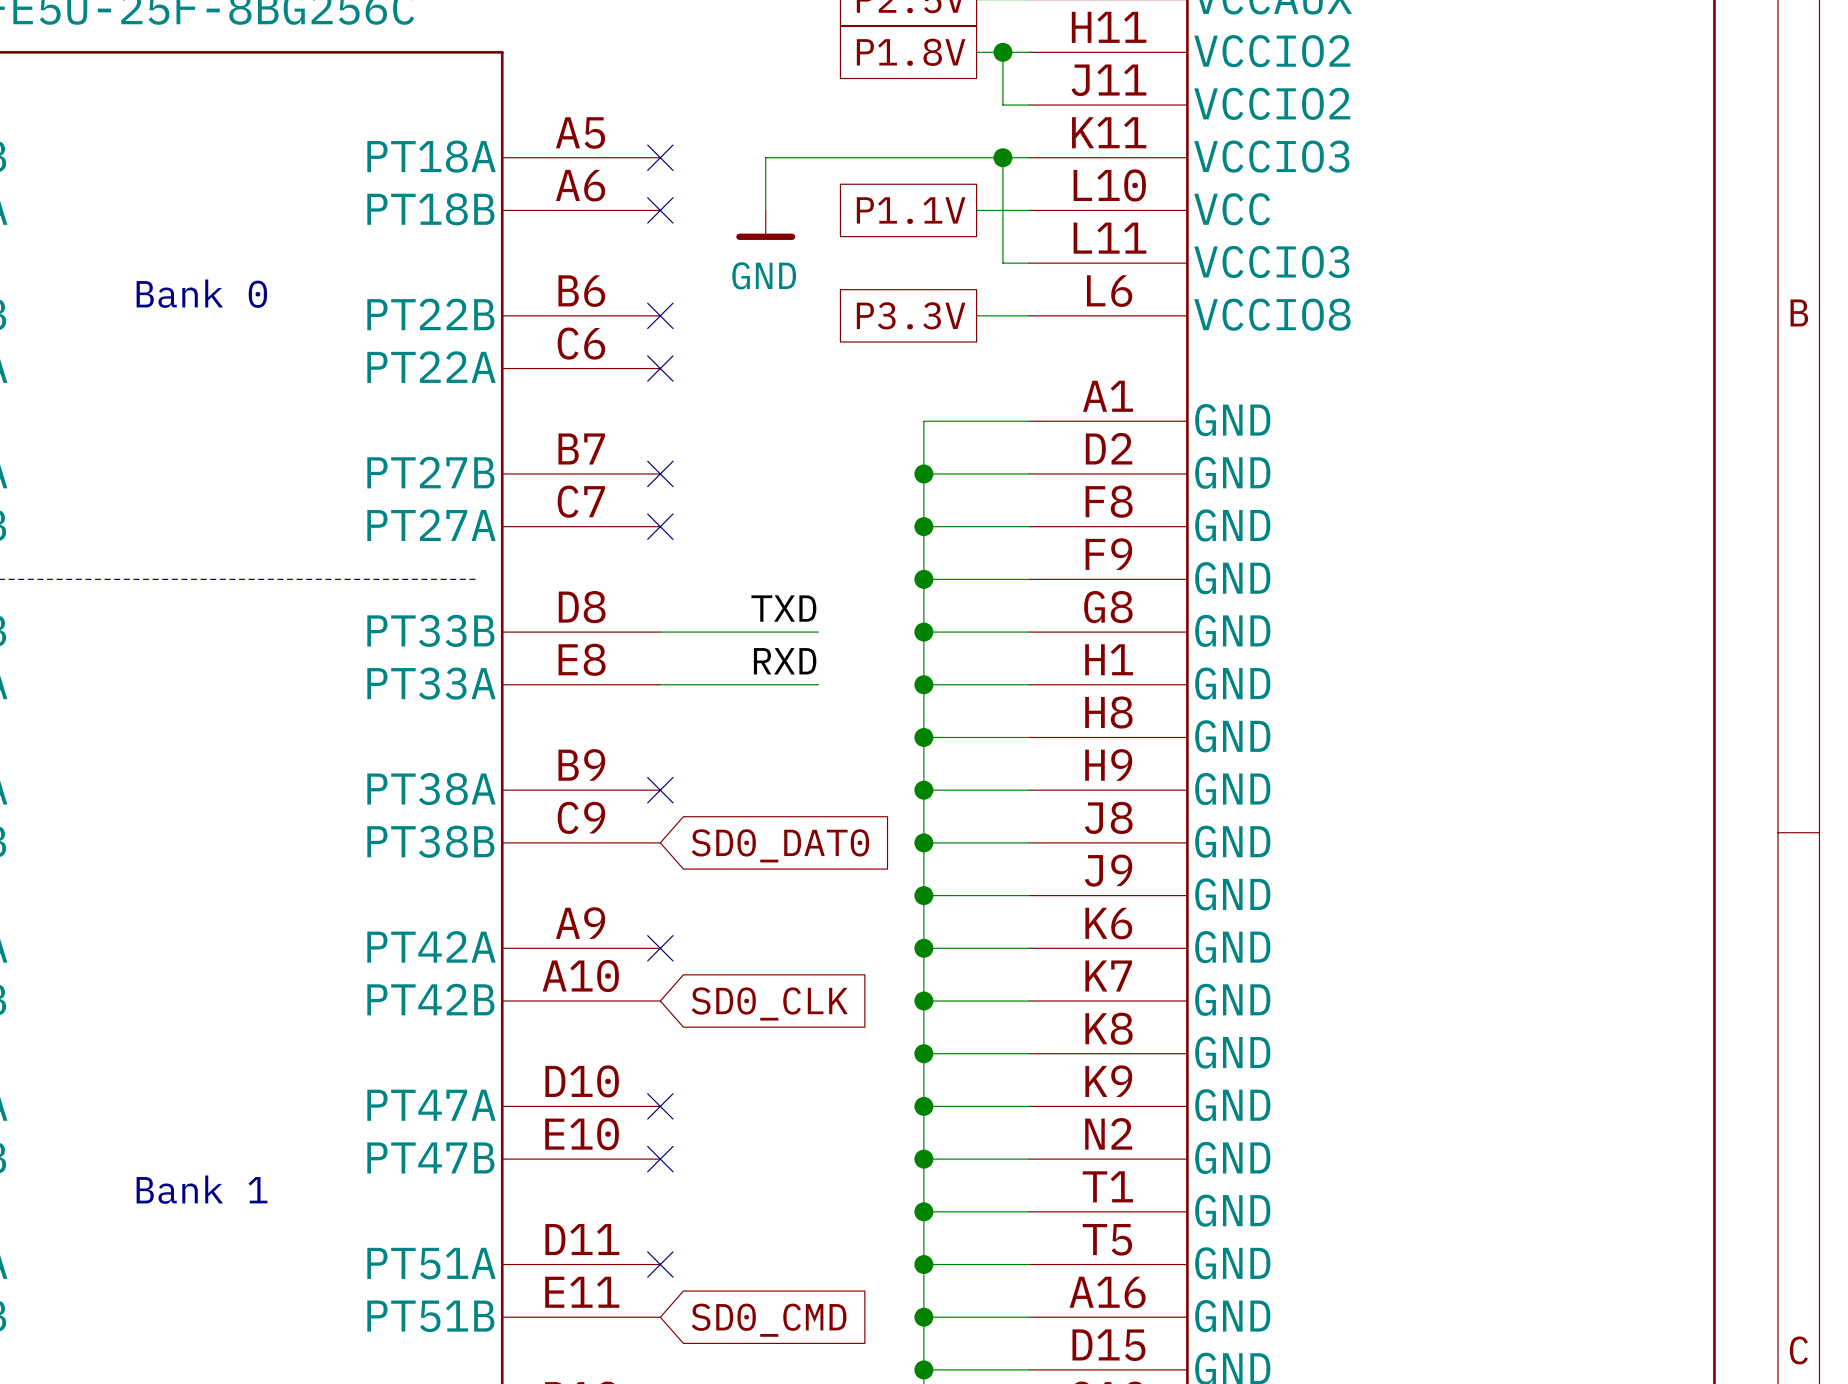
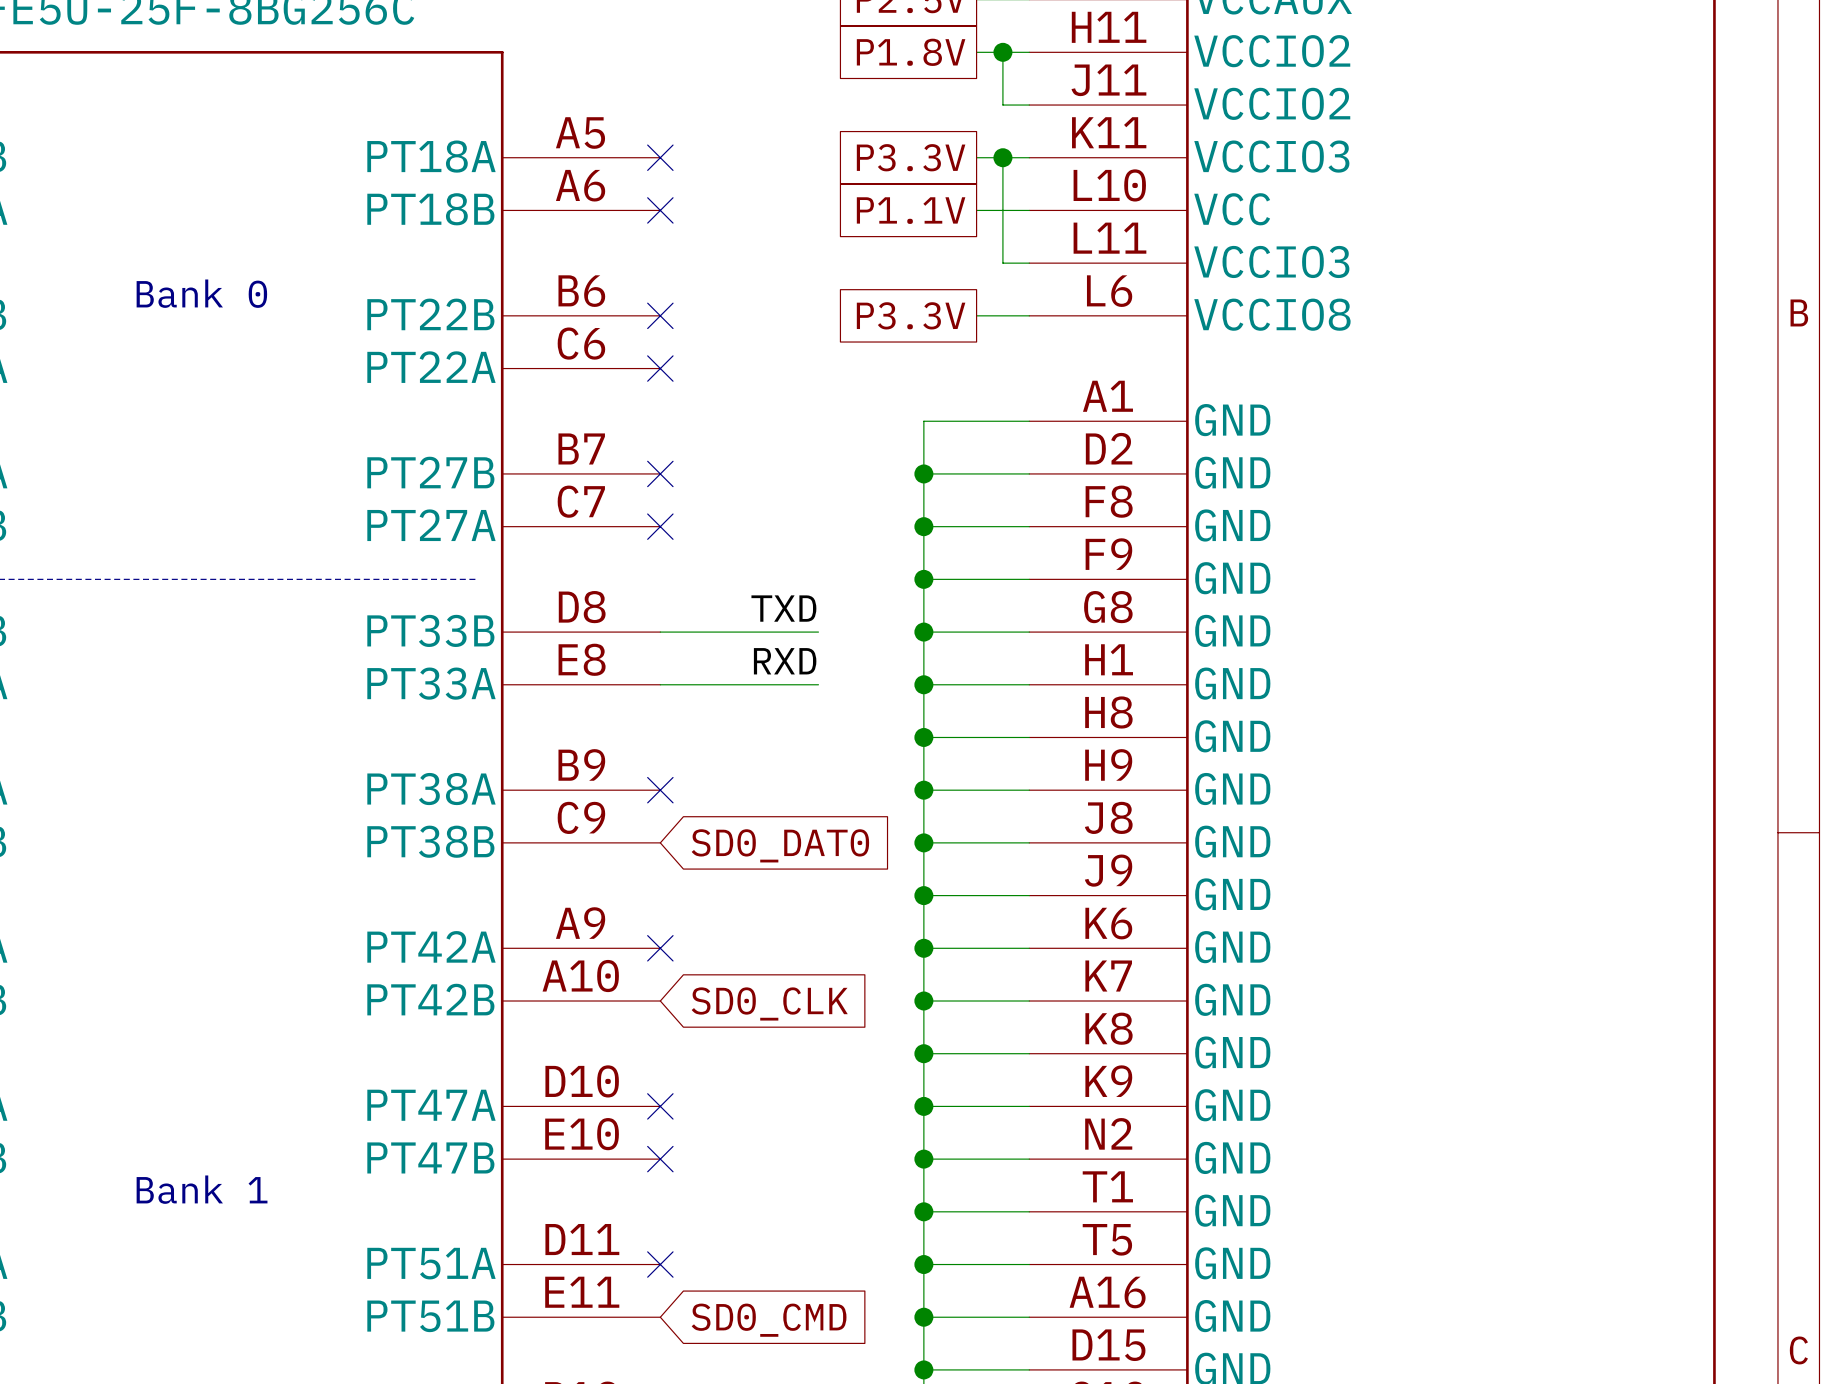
global label: none -> P3.3V (911, 157)
wire: (976, 157) (765, 157) (765, 210) -> none
power symbol: GND (765, 225) -> none

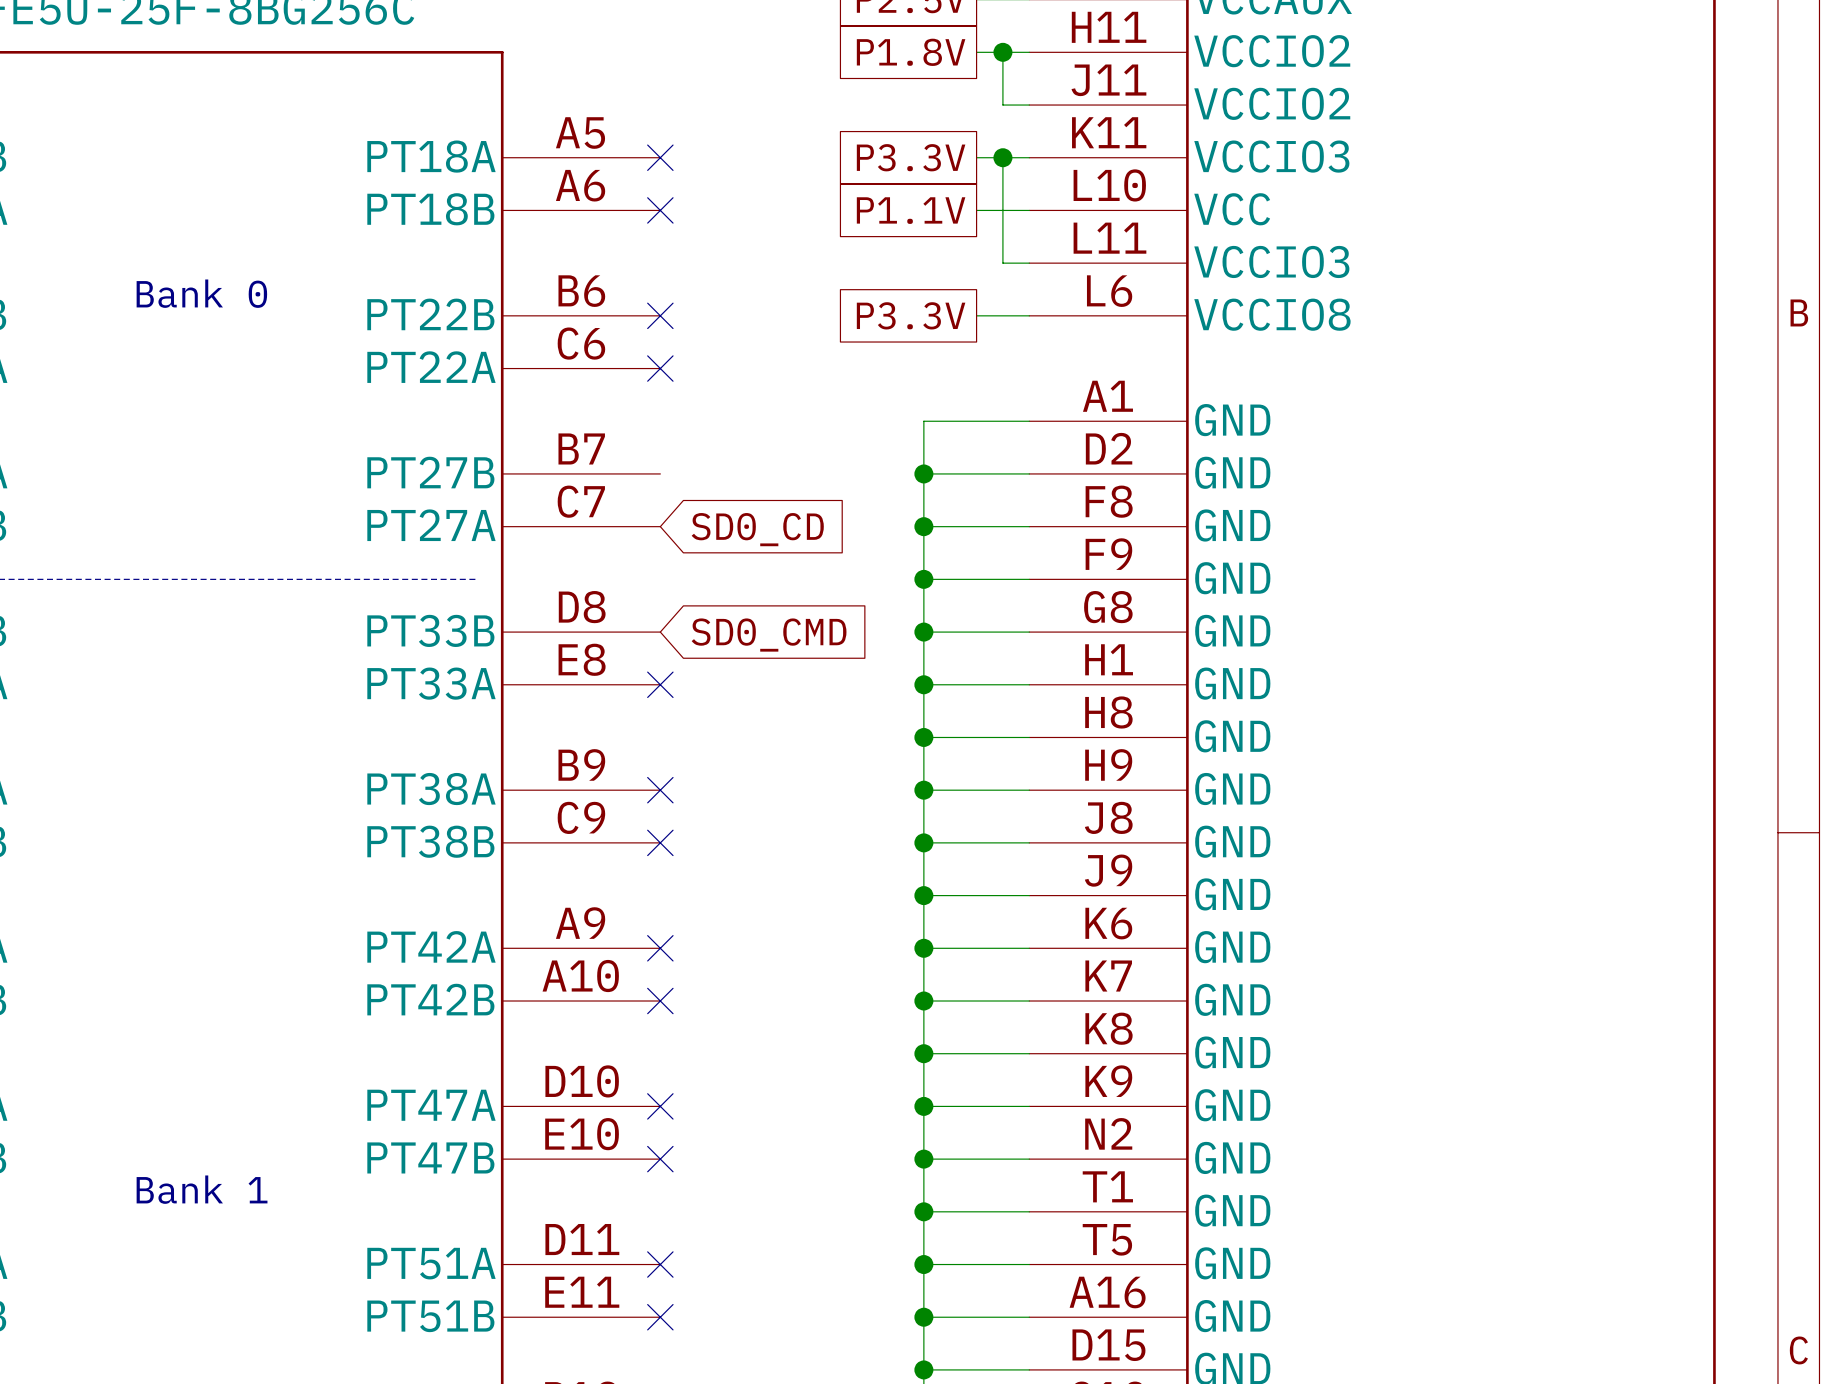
no-connect mark: (660, 473) -> none
no-connect mark: (660, 526) -> none
global label: none -> SD0_CD (757, 529)
label: TXD (783, 608) -> none
wire: (660, 632) (818, 632) -> none
global label: none -> SD0_CMD (769, 635)
label: RXD (785, 661) -> none
wire: (660, 684) (818, 684) -> none
no-connect mark: none -> (660, 684)
no-connect mark: none -> (660, 842)
global label: SD0_DAT0 (780, 845) -> none
no-connect mark: none -> (660, 1001)
global label: SD0_CLK (769, 1003) -> none
no-connect mark: none -> (660, 1317)
global label: SD0_CMD (769, 1320) -> none

